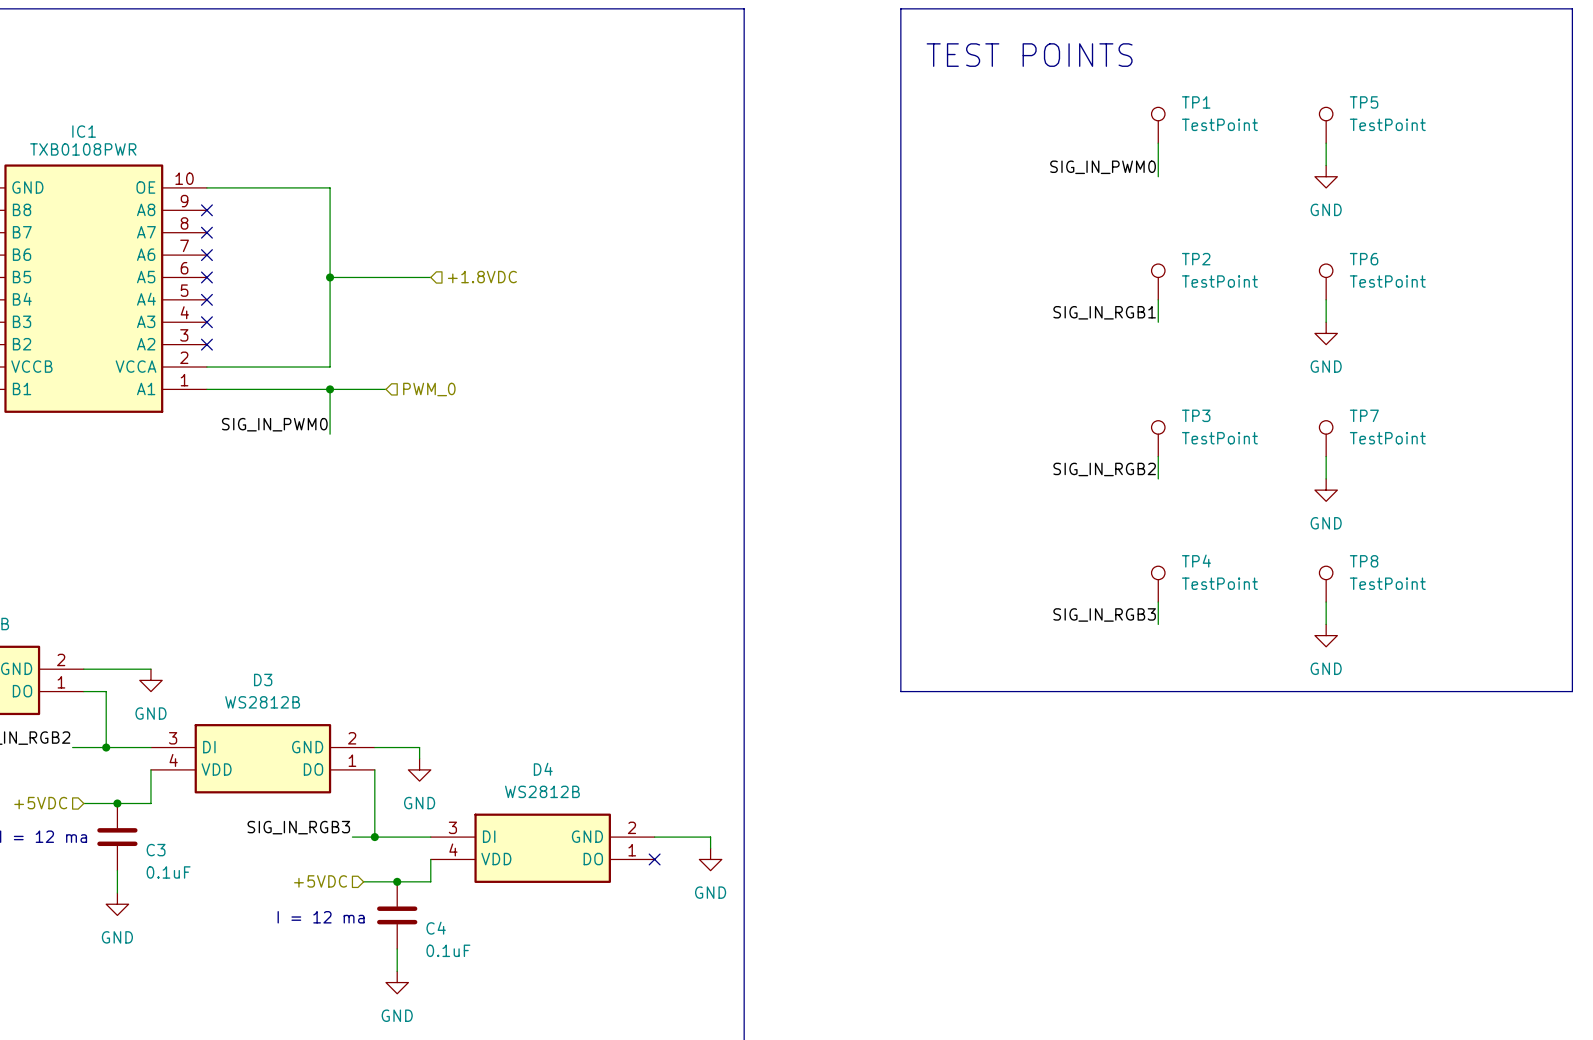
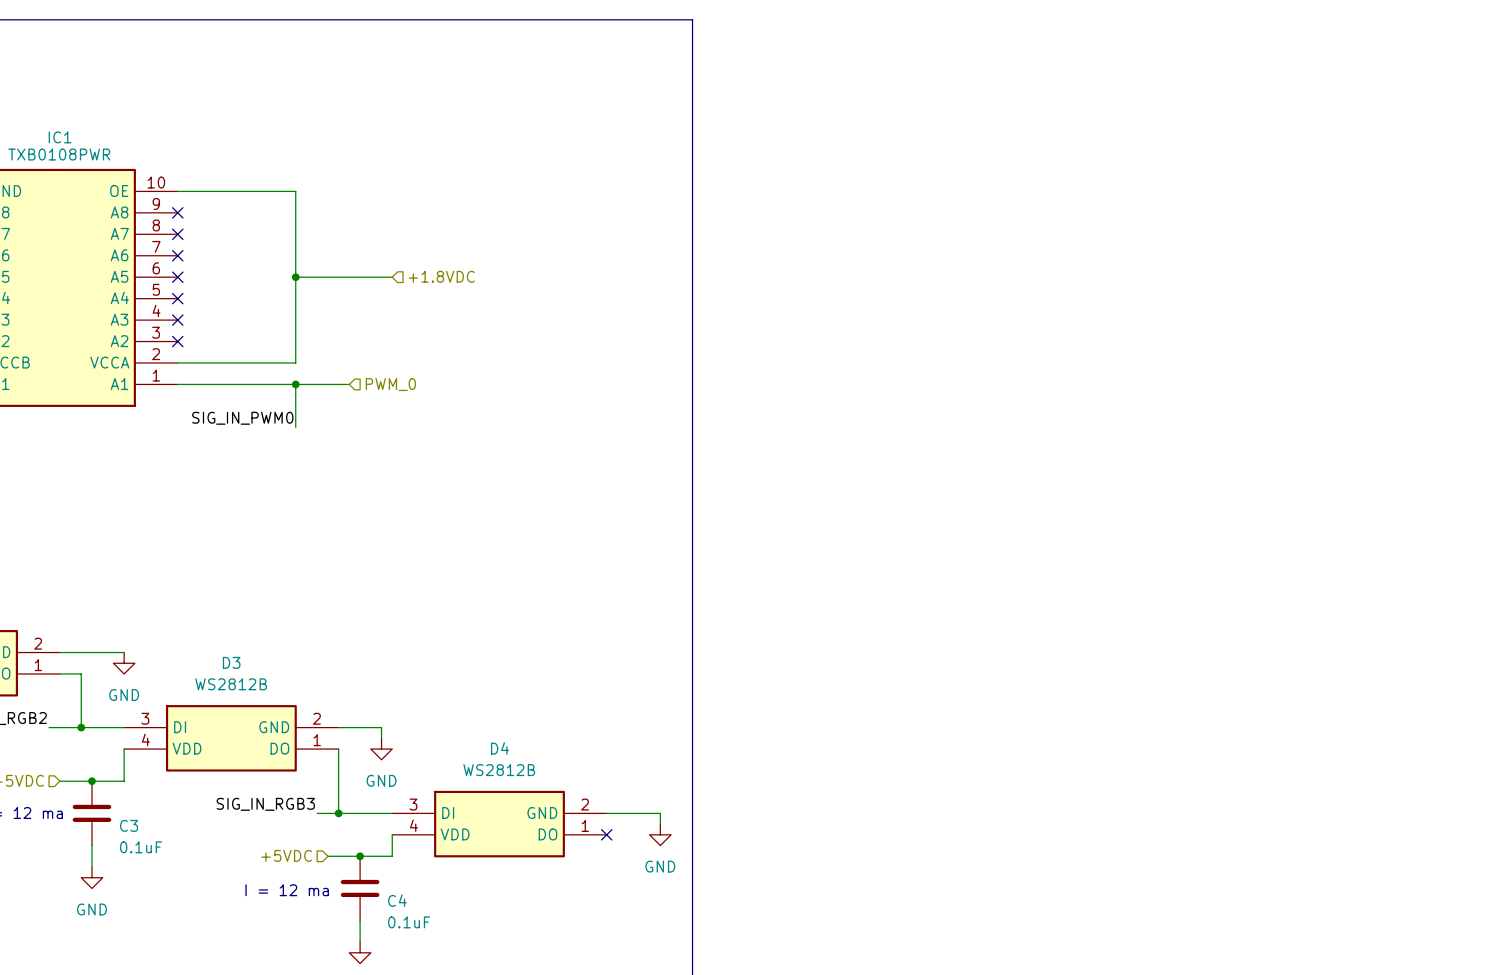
line: (900, 8) (1572, 8) (1572, 691) (900, 691) (900, 8) -> none
text: TEST POINTS (1029, 55) -> none
TP1: TestPoint (1158, 125) -> none
TP5: TestPoint (1326, 125) -> none
wire: (1158, 143) (1158, 176) -> none
wire: (1326, 143) (1326, 165) -> none
label: SIG_IN_PWM0 (1103, 167) -> none
power symbol: GND (1326, 176) -> none
TP2: TestPoint (1158, 281) -> none
TP6: TestPoint (1326, 281) -> none
wire: (1158, 299) (1158, 322) -> none
wire: (1326, 299) (1326, 322) -> none
label: SIG_IN_RGB1 (1104, 312) -> none
power symbol: GND (1326, 333) -> none
TP3: TestPoint (1158, 438) -> none
TP7: TestPoint (1326, 438) -> none
wire: (1158, 456) (1158, 478) -> none
wire: (1326, 456) (1326, 478) -> none
label: SIG_IN_RGB2 (1104, 469) -> none
power symbol: GND (1326, 490) -> none
TP4: TestPoint (1158, 584) -> none
TP8: TestPoint (1326, 584) -> none
wire: (1158, 602) (1158, 624) -> none
wire: (1326, 602) (1326, 624) -> none
label: SIG_IN_RGB3 (1104, 614) -> none
power symbol: GND (1326, 635) -> none

